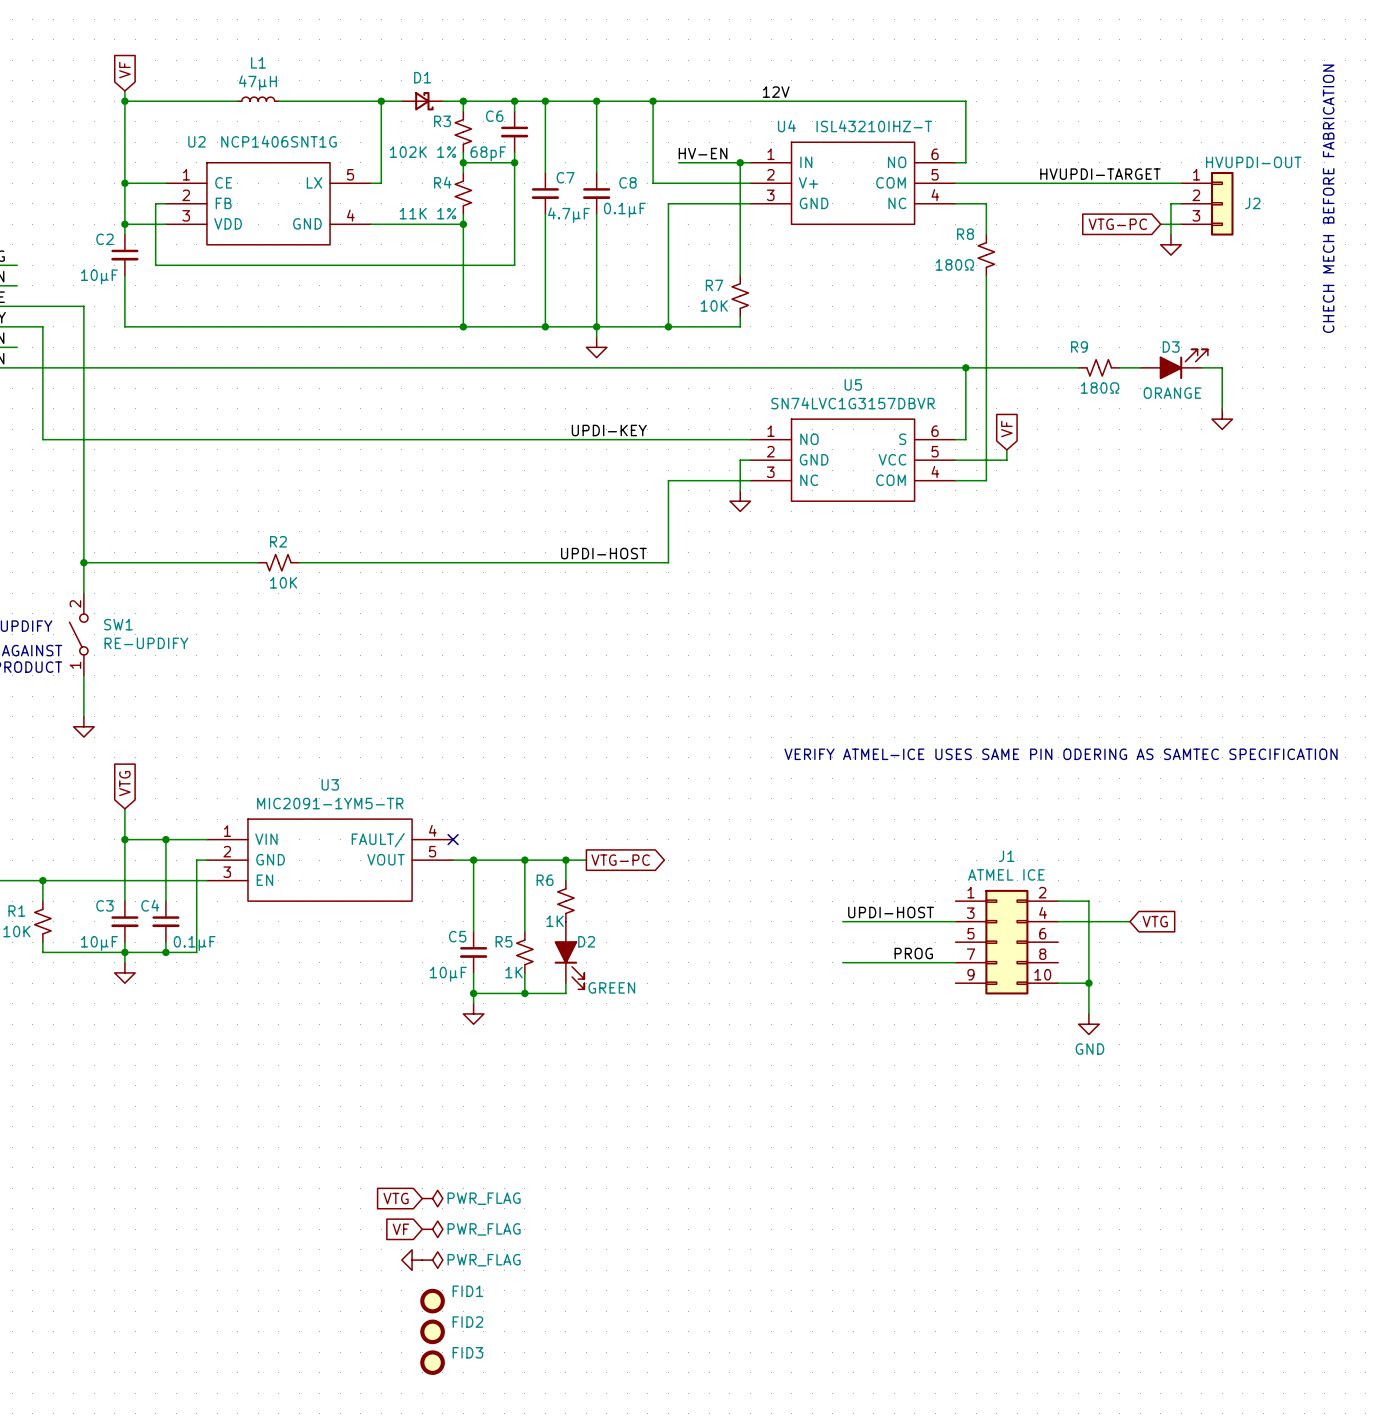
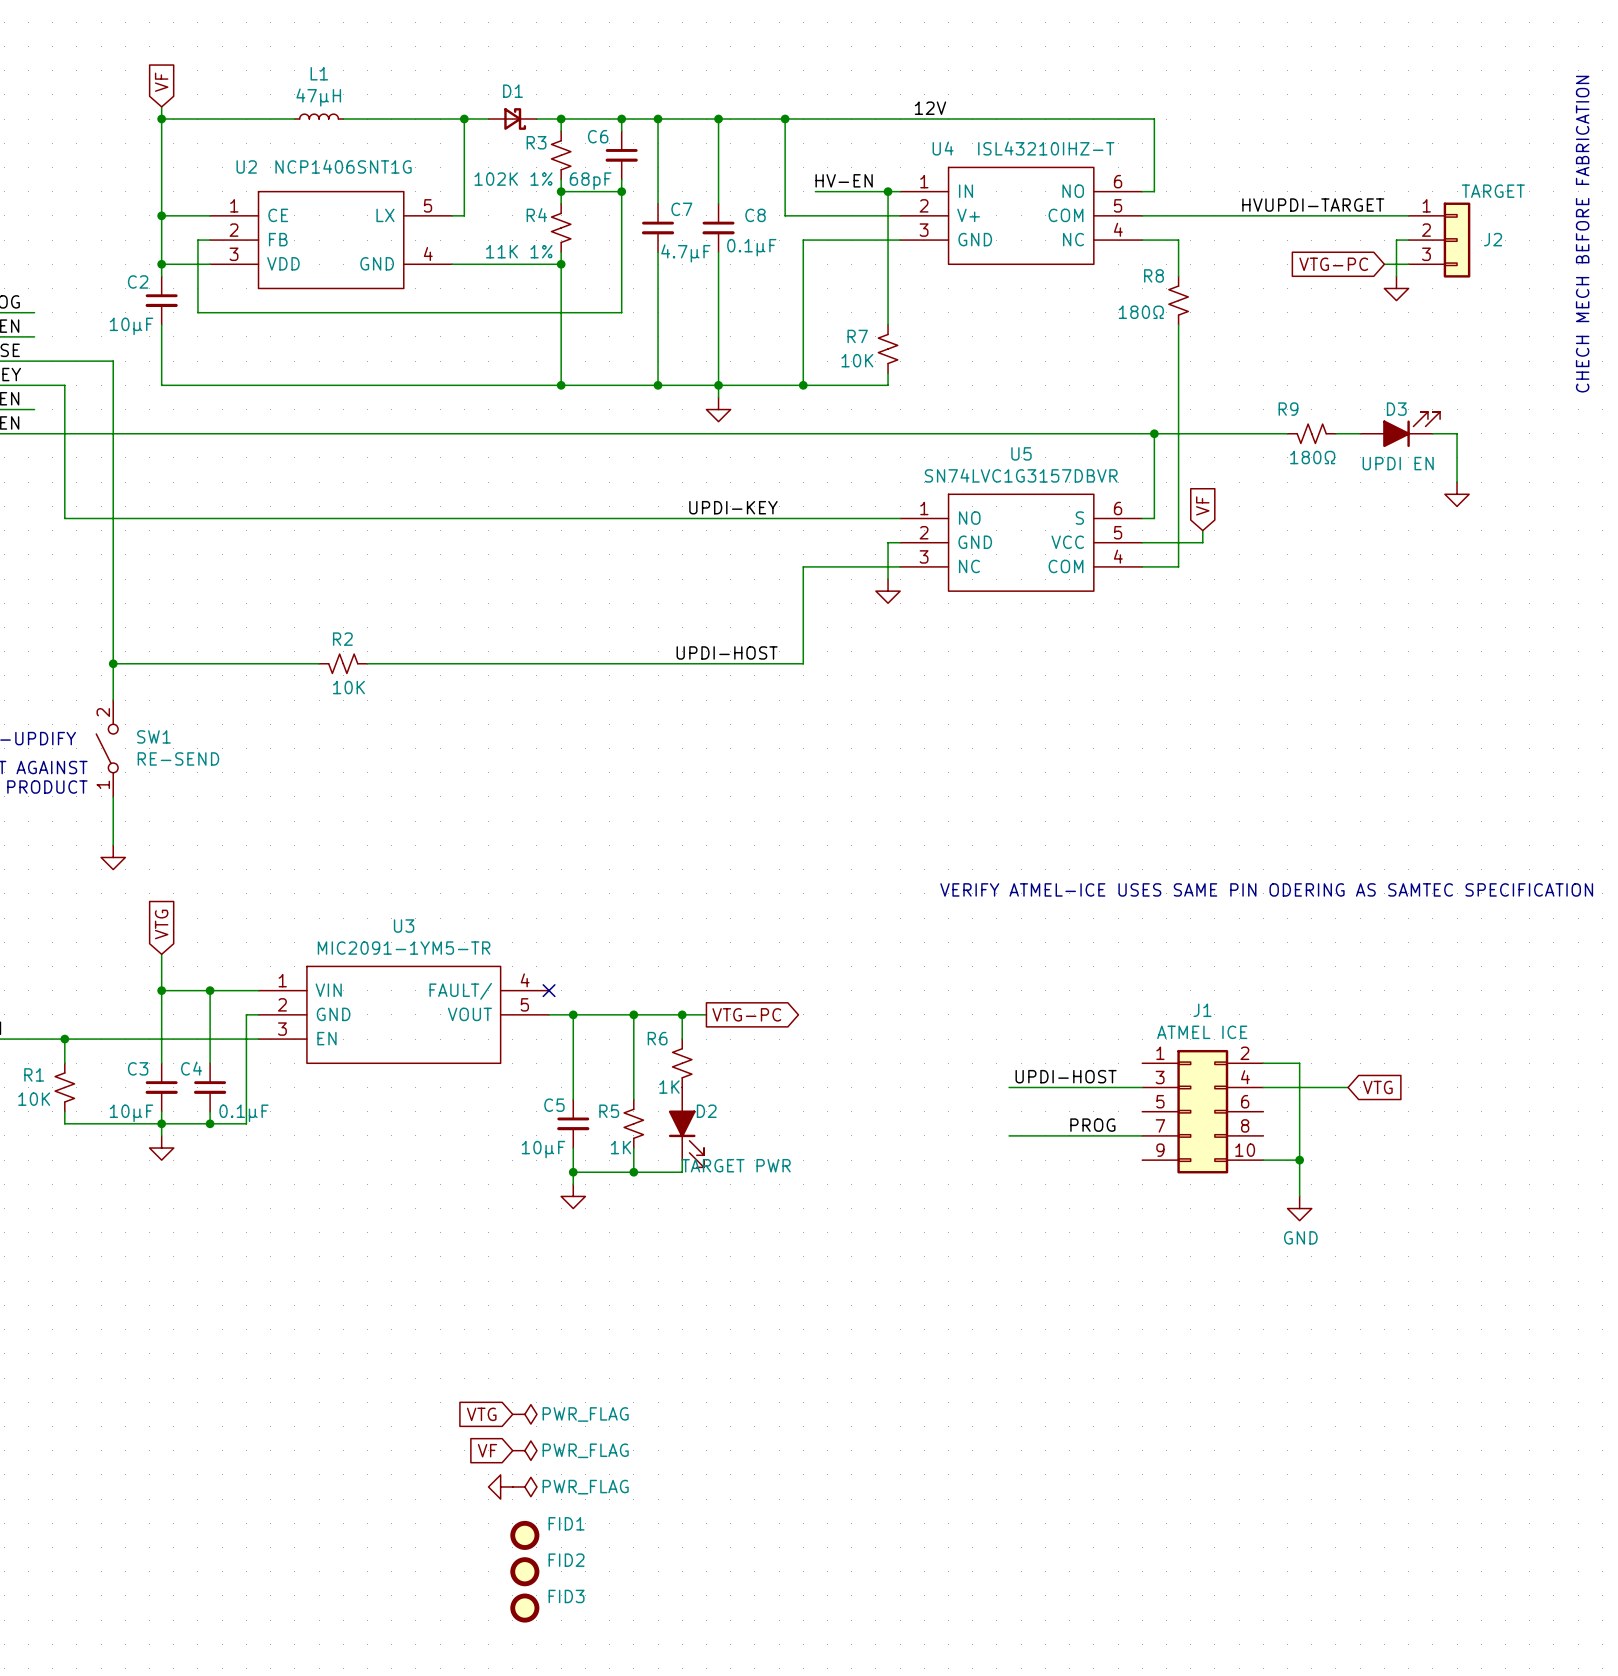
J2 value: HVUPDI-OUT (1253, 162) -> TARGET (1493, 191)
D3 value: ORANGE (1172, 393) -> UPDI EN (1398, 463)
SW1 value: RE-UPDIFY (146, 643) -> RE-SEND (178, 758)
D2 value: GREEN (611, 987) -> TARGET PWR (736, 1165)

